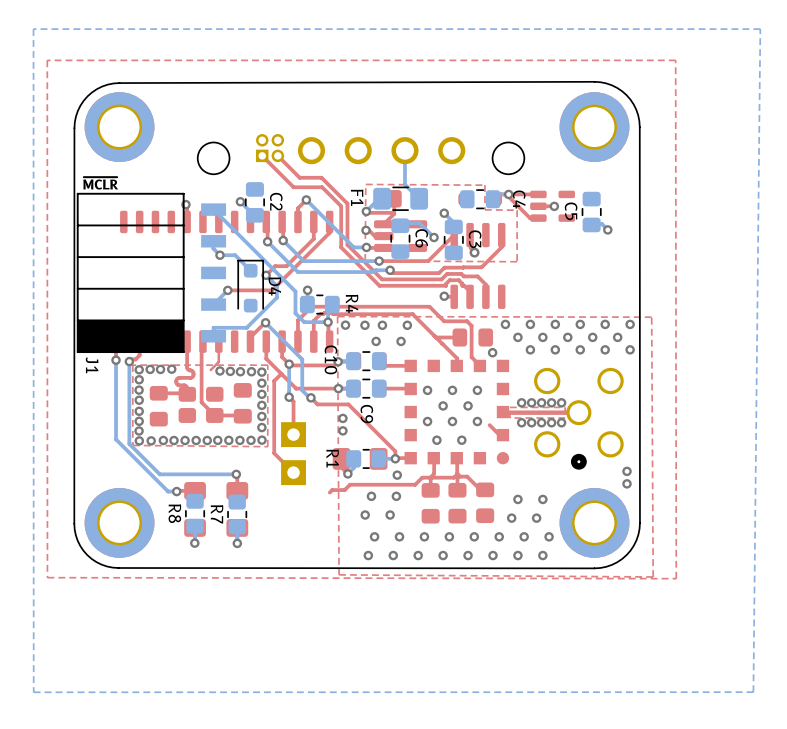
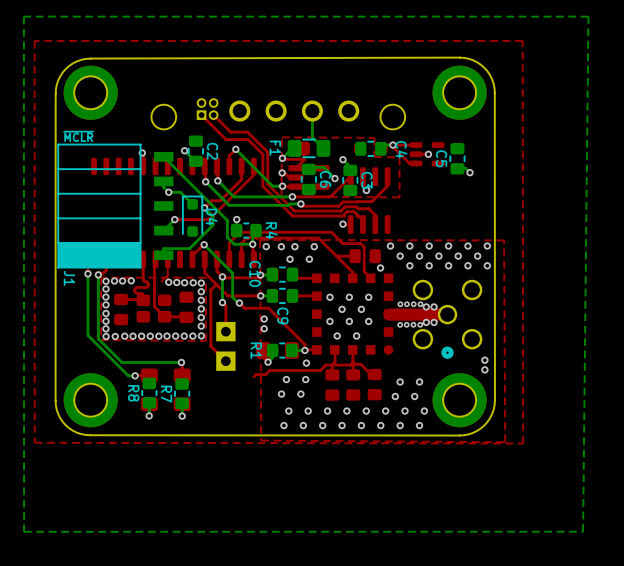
via: none -> (400, 304)
via: none -> (406, 304)
via: none -> (413, 304)
via: none -> (420, 304)
via: (521, 402) -> none
via: (531, 402) -> none
via: (541, 402) -> none
top track width: thin (578, 412) (504, 412) -> thick (447, 314) (389, 314)
via: (521, 422) -> none
via: (531, 422) -> none
via: (541, 422) -> none
top track: (489, 425) (499, 435) -> none
via: none -> (400, 324)
via: none -> (406, 324)
via: none -> (413, 324)
via: none -> (420, 324)

